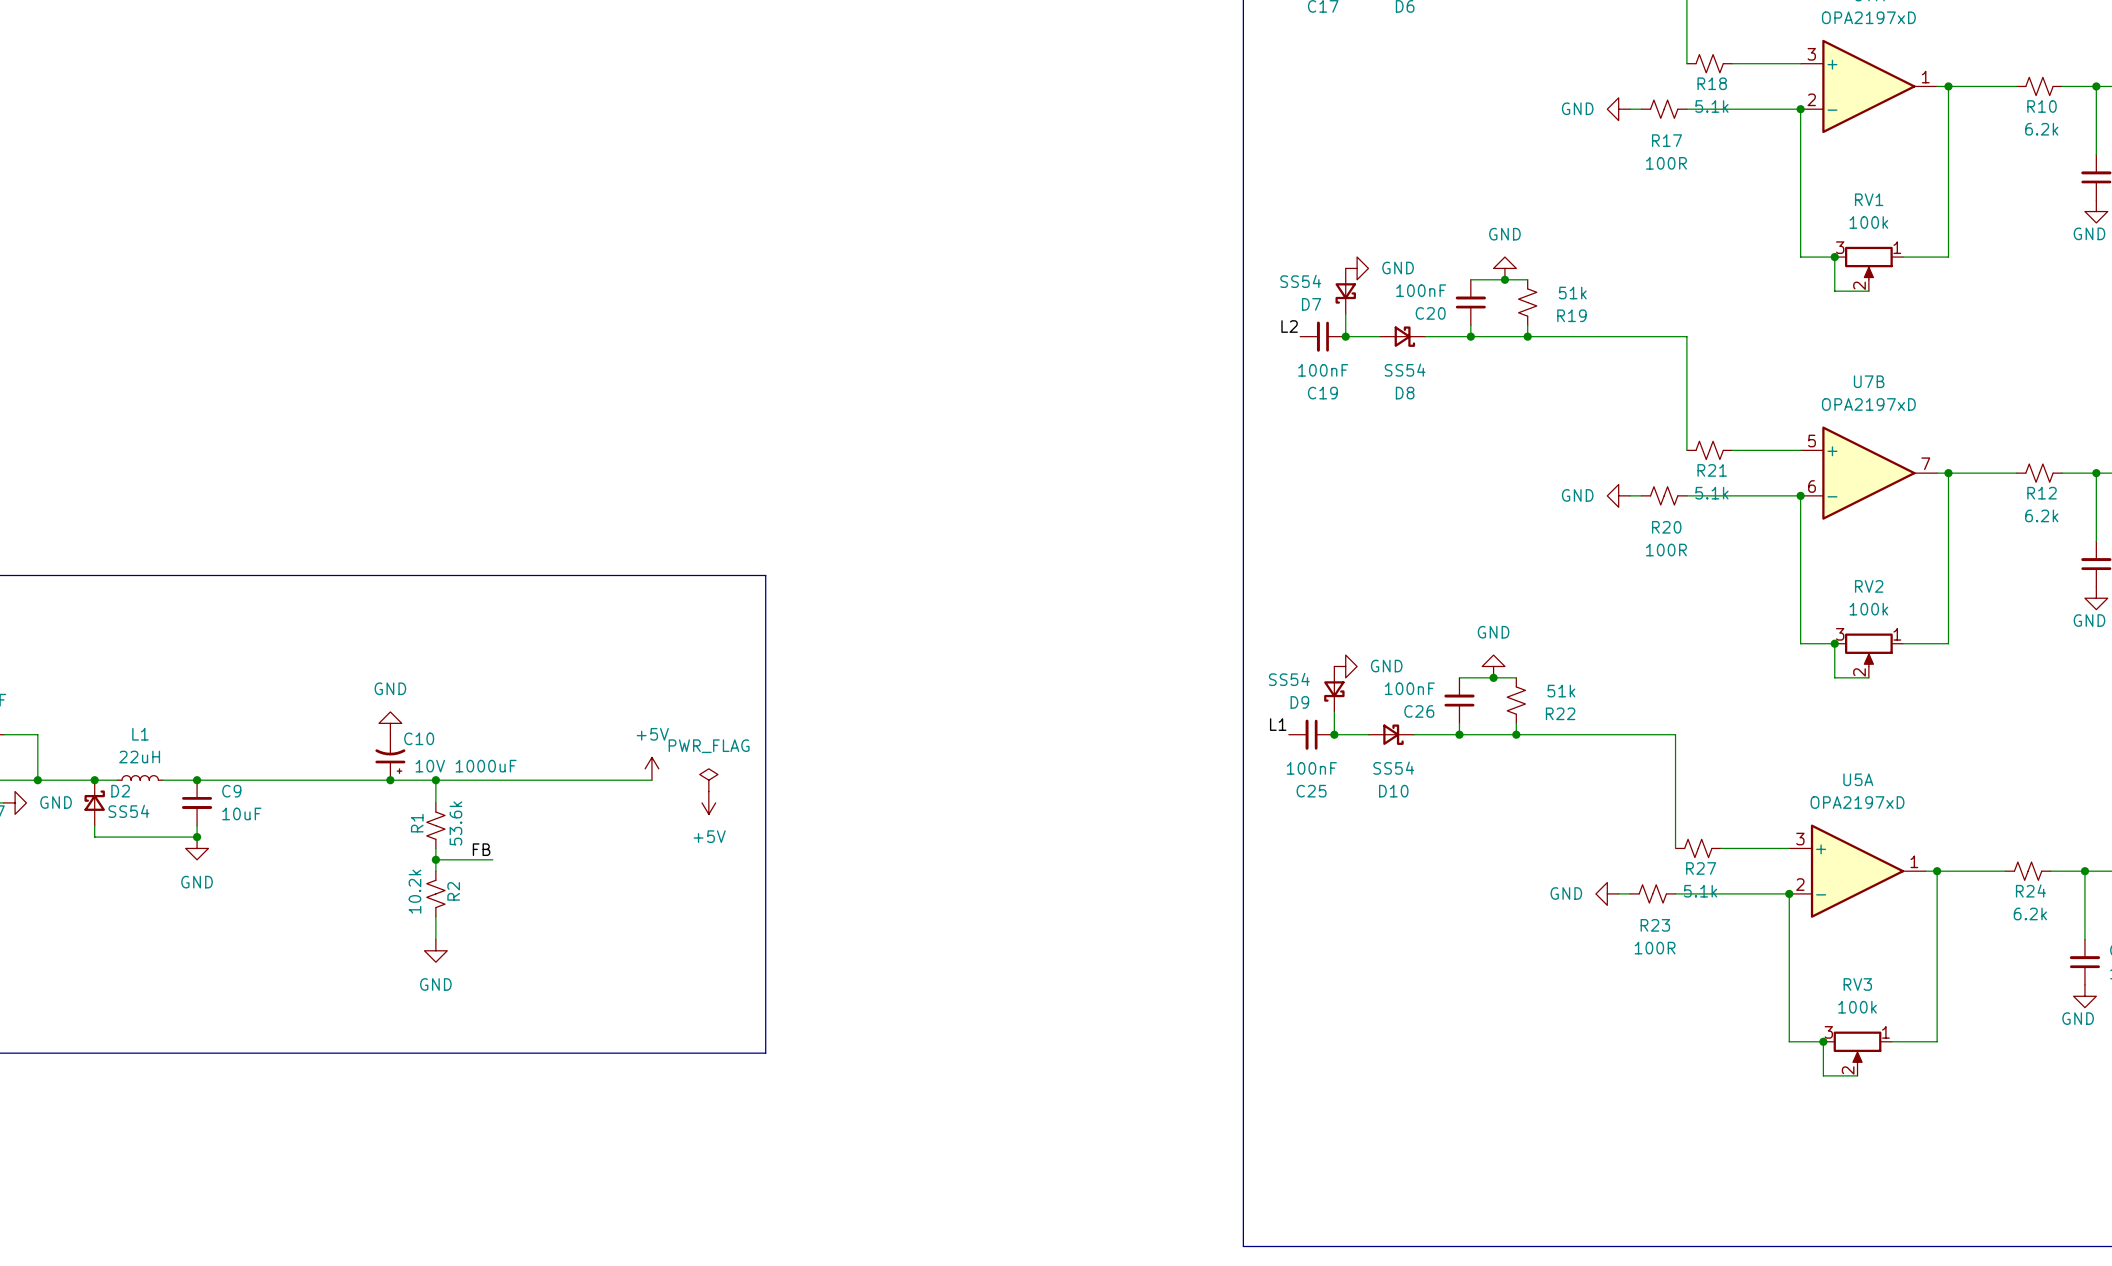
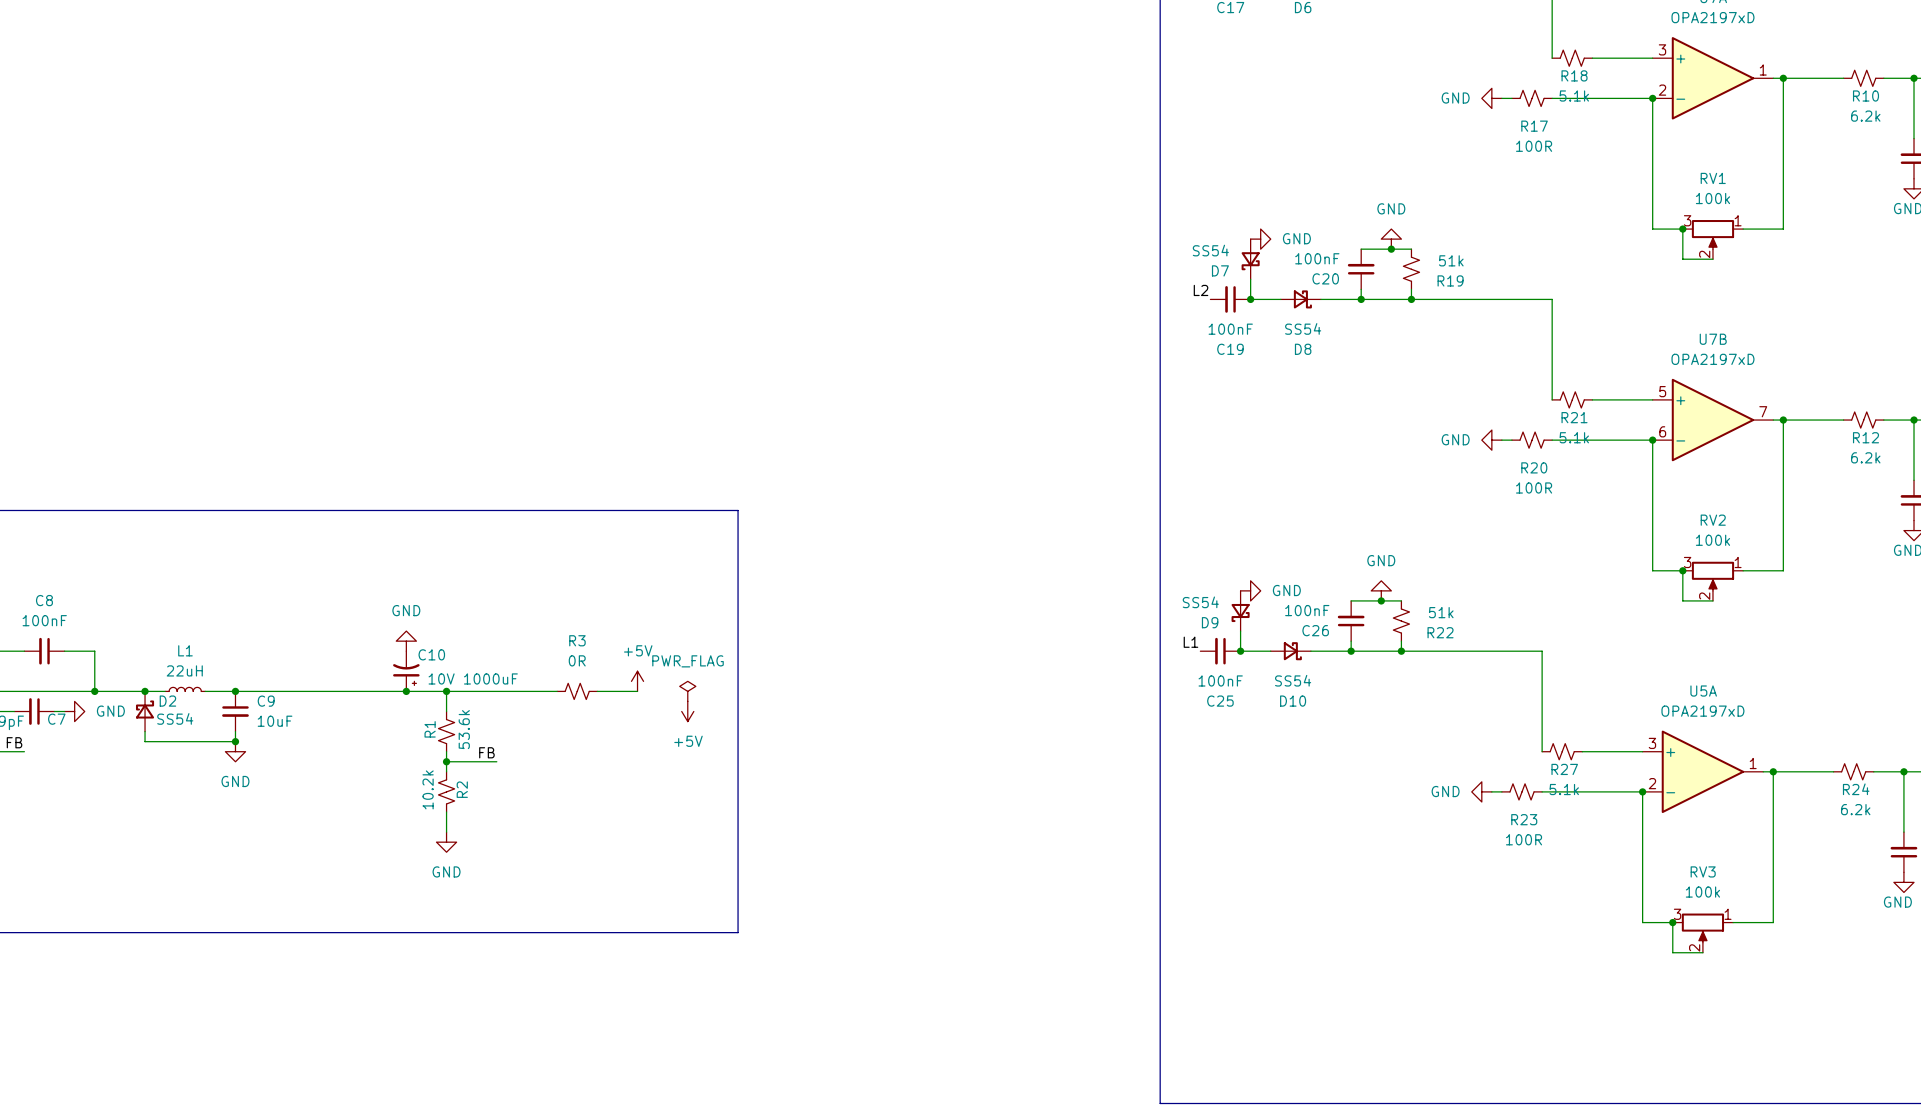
R3: none -> 0R (577, 691)

